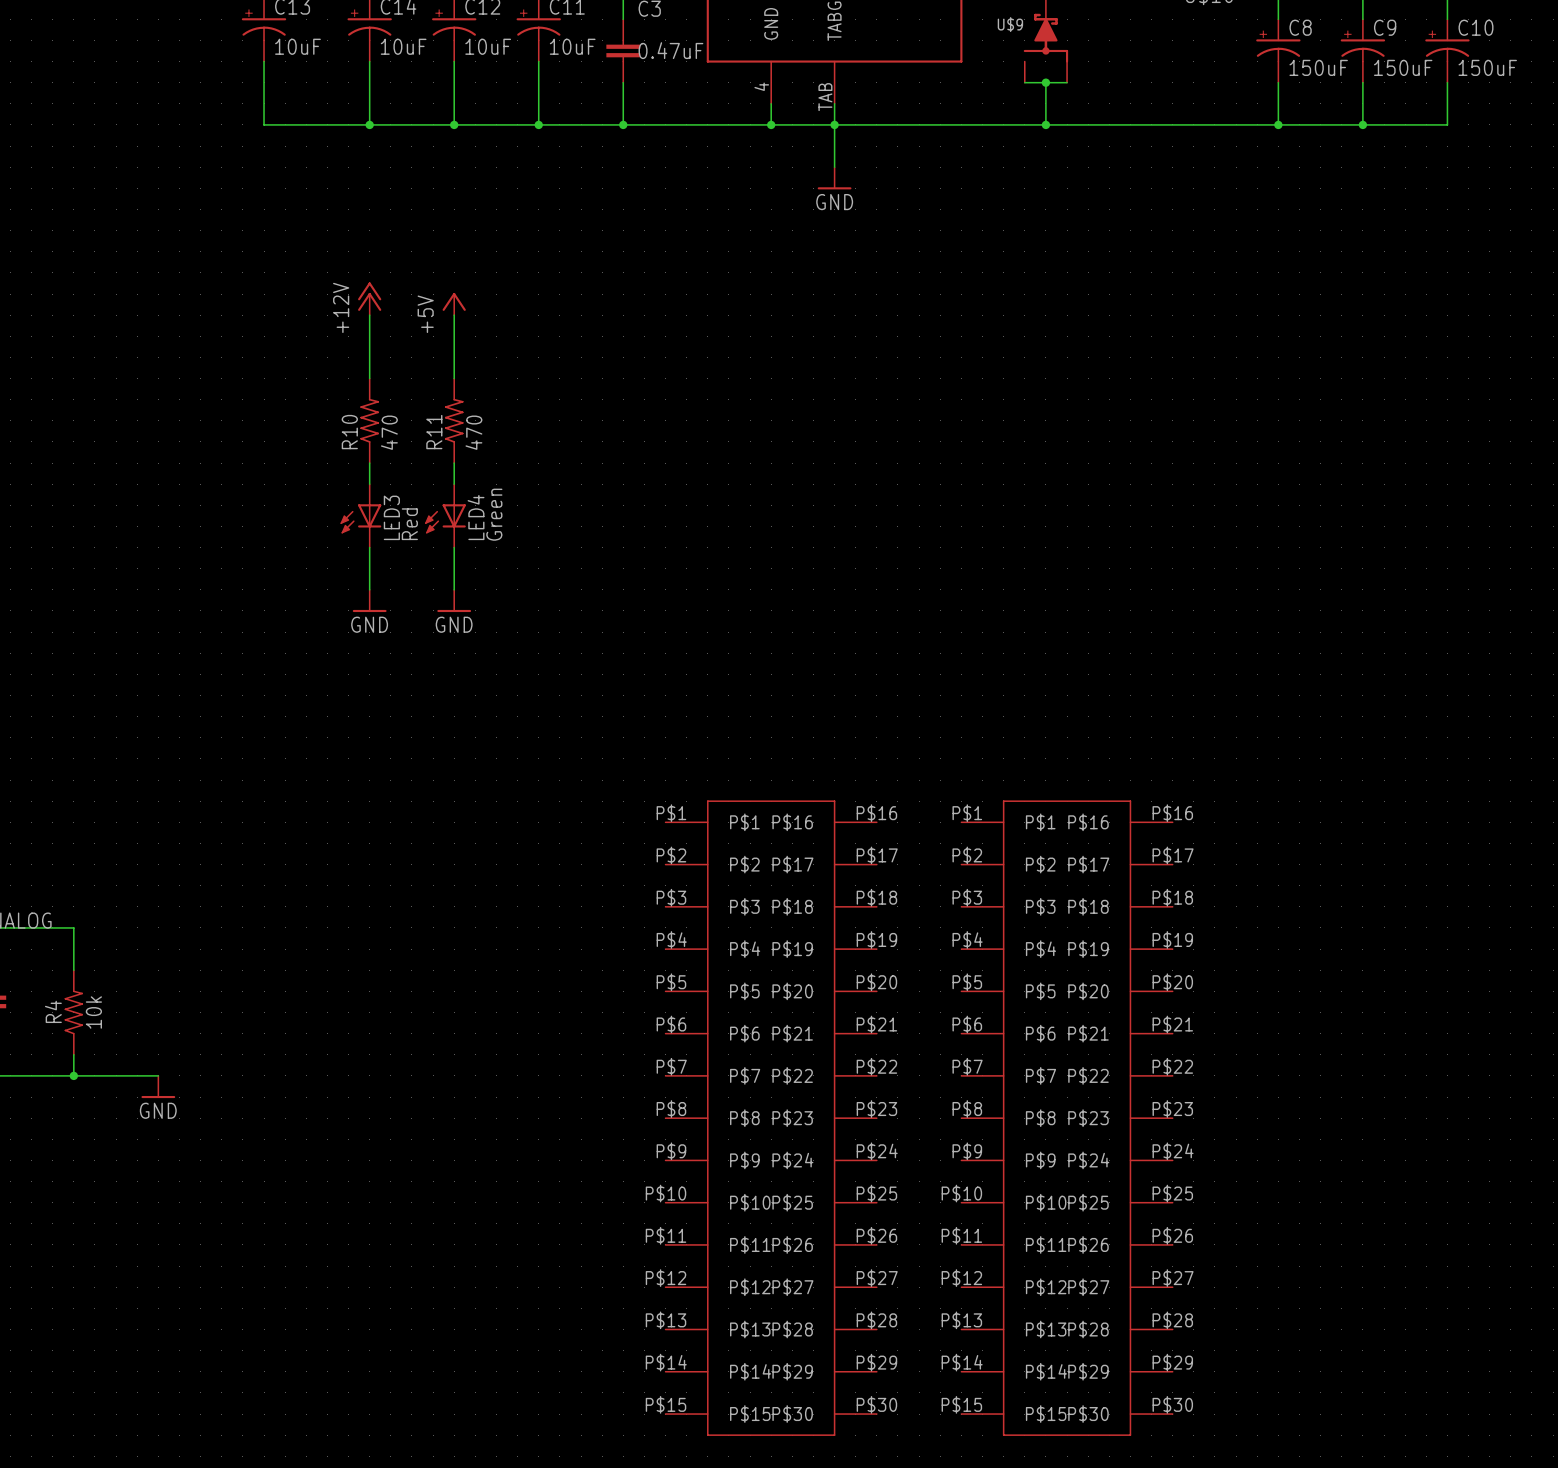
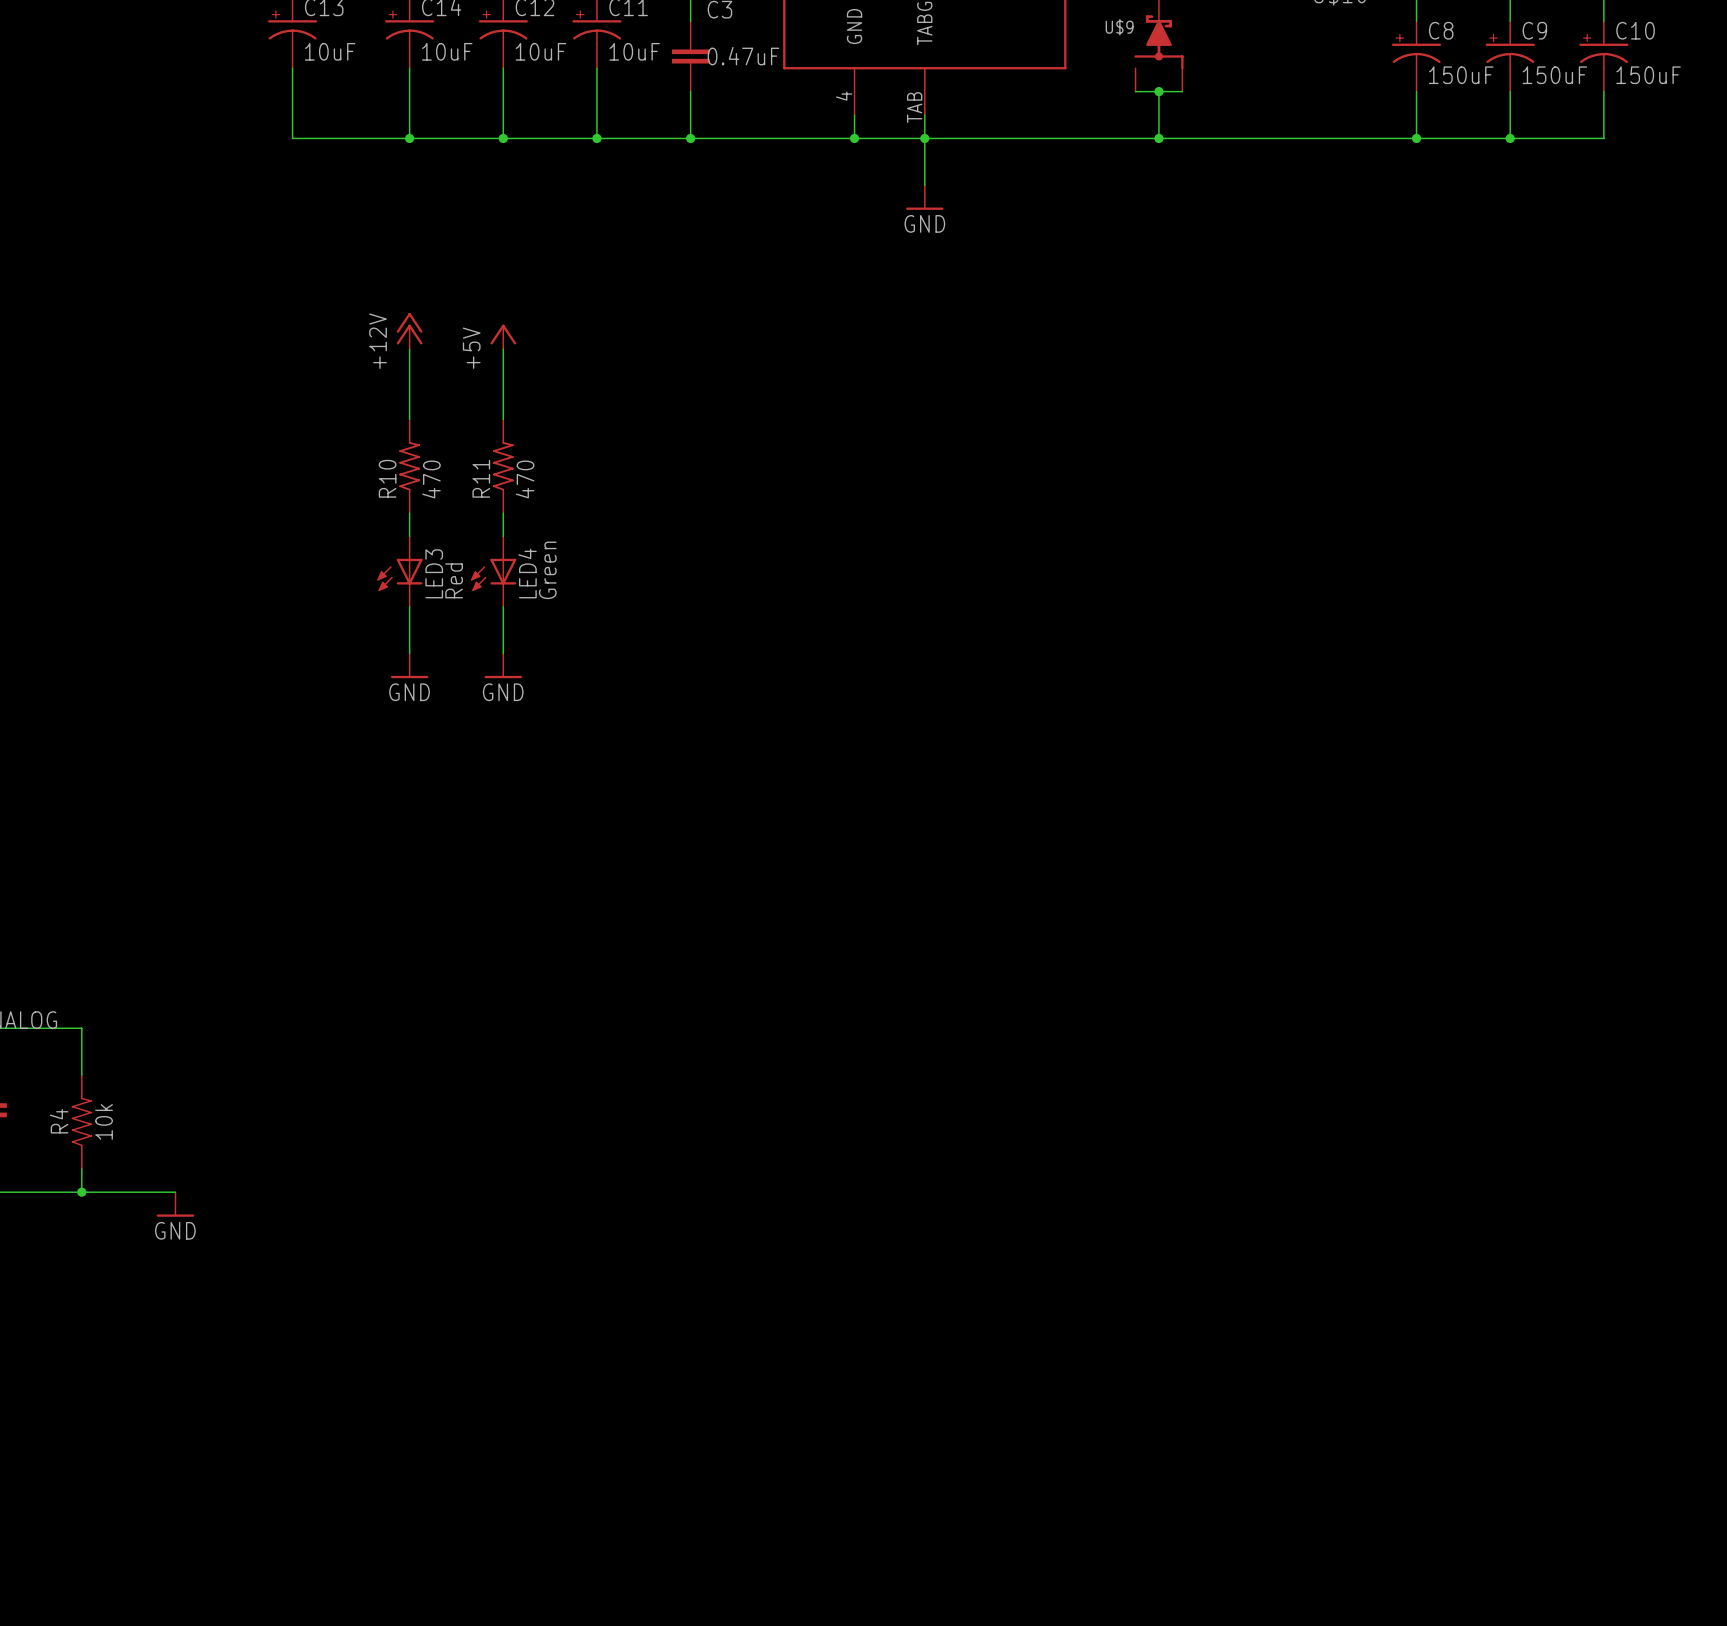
part: (771, 1118) -> none
part: (1067, 1118) -> none

